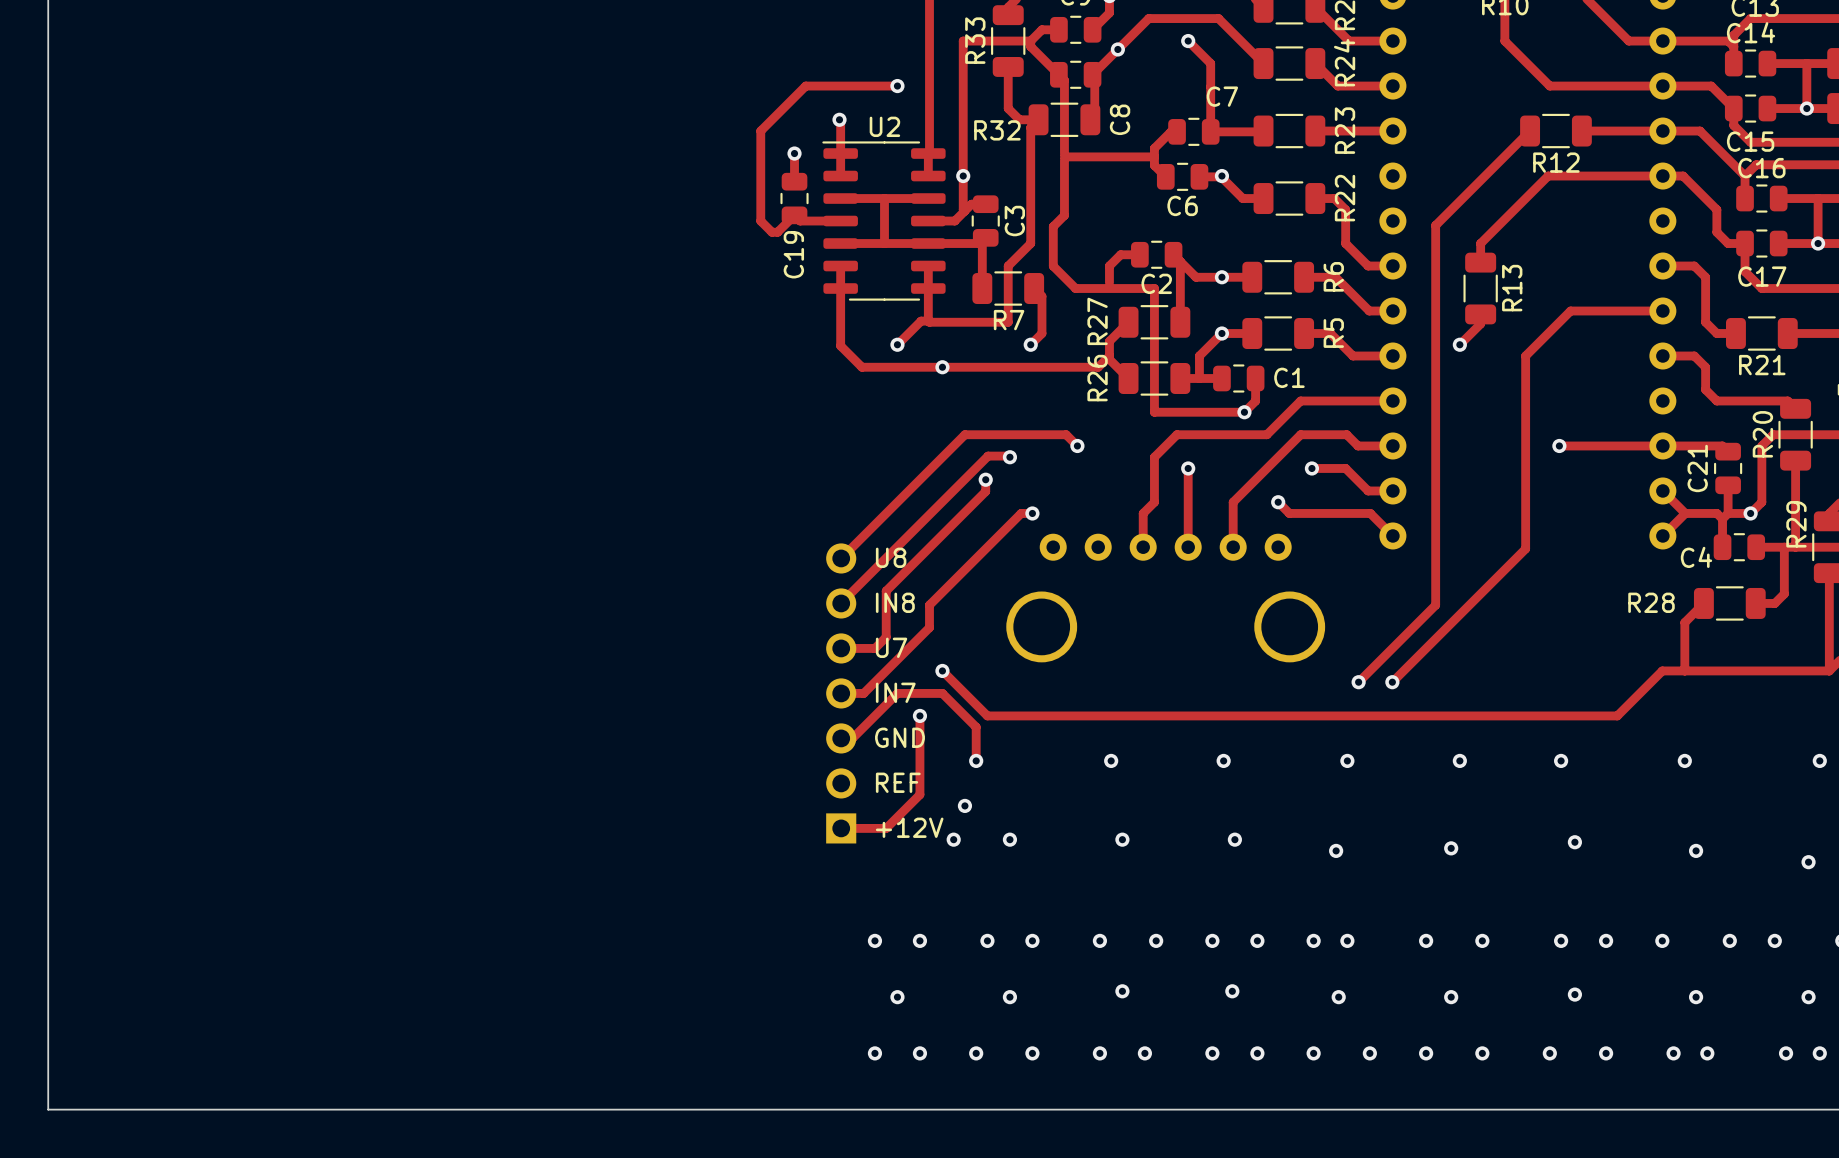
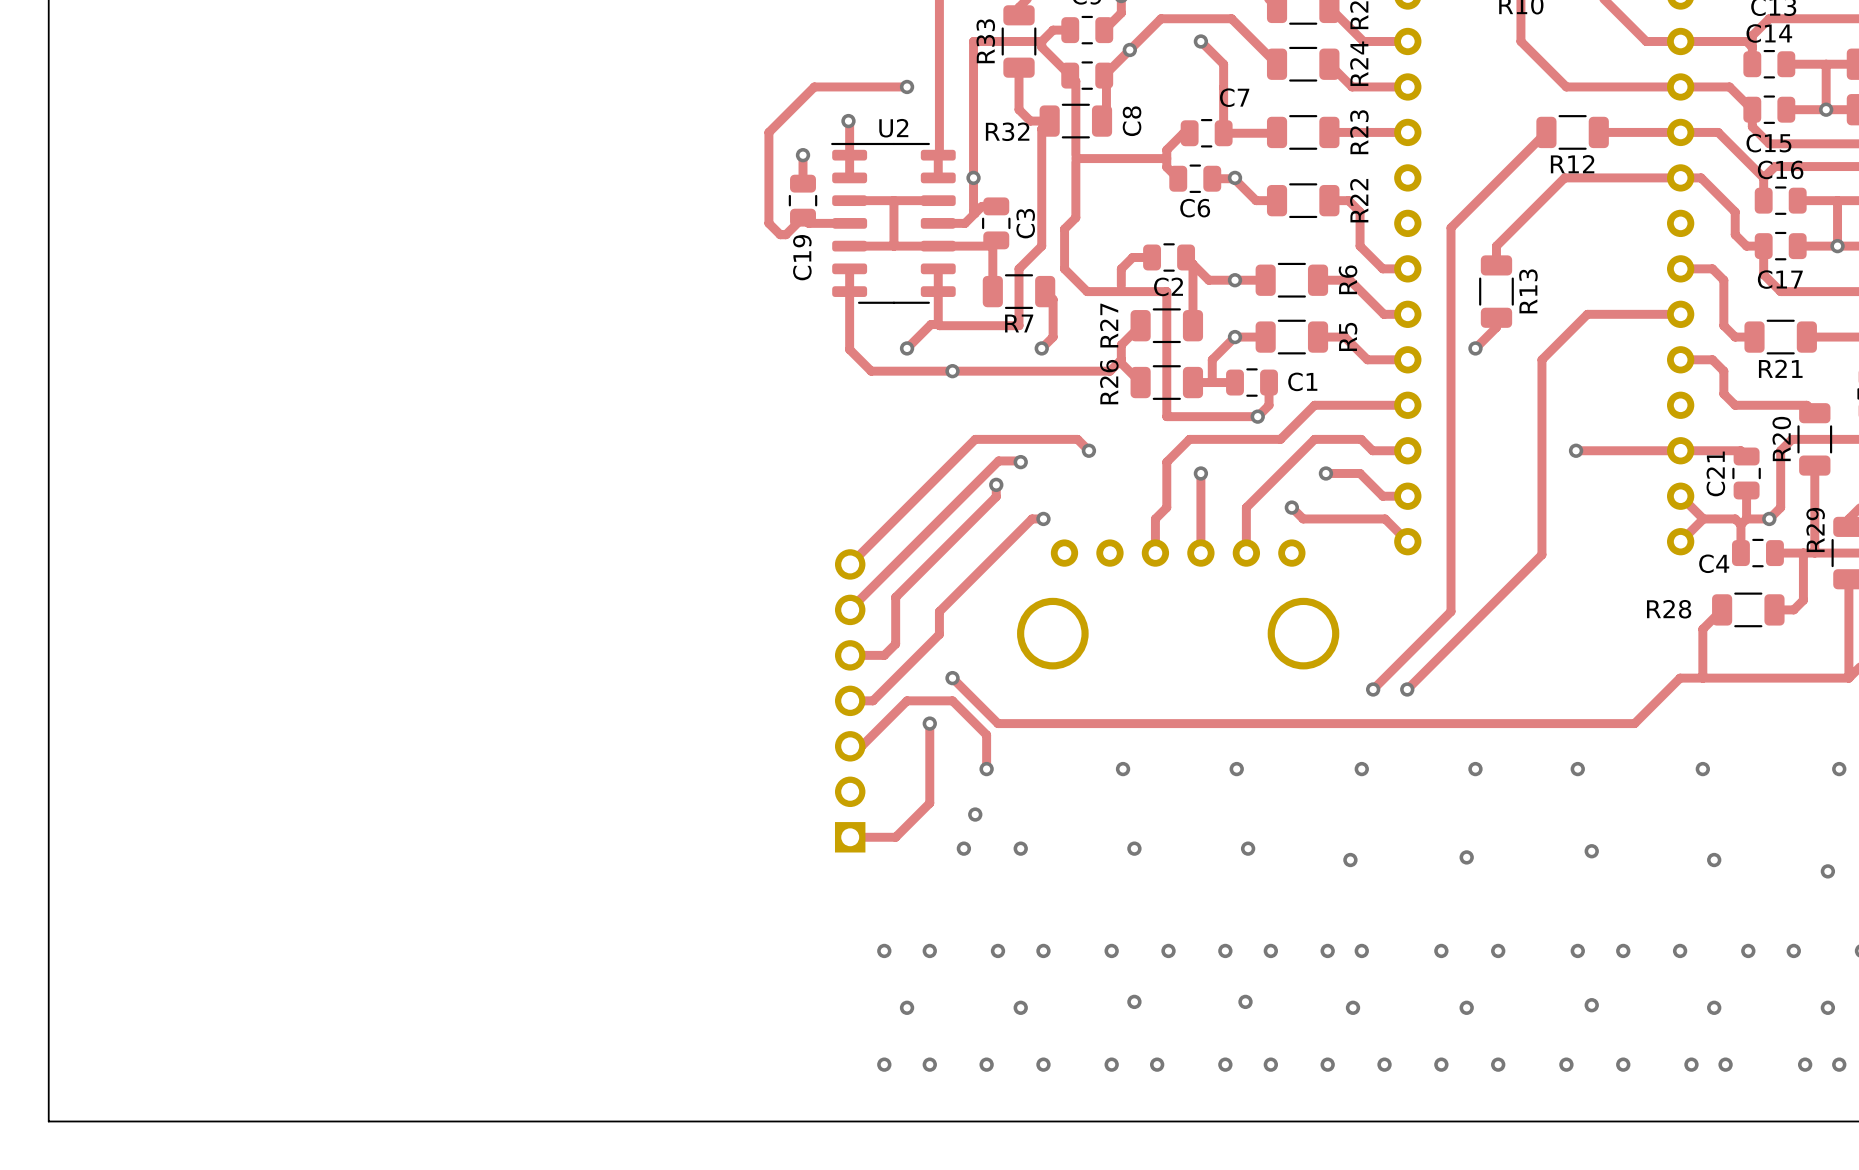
text: U8 (891, 557) -> none
text: IN8 (895, 602) -> none
text: U7 (891, 647) -> none
text: IN7 (895, 692) -> none
text: GND (899, 737) -> none
text: REF (898, 782) -> none
text: +12V (909, 827) -> none

